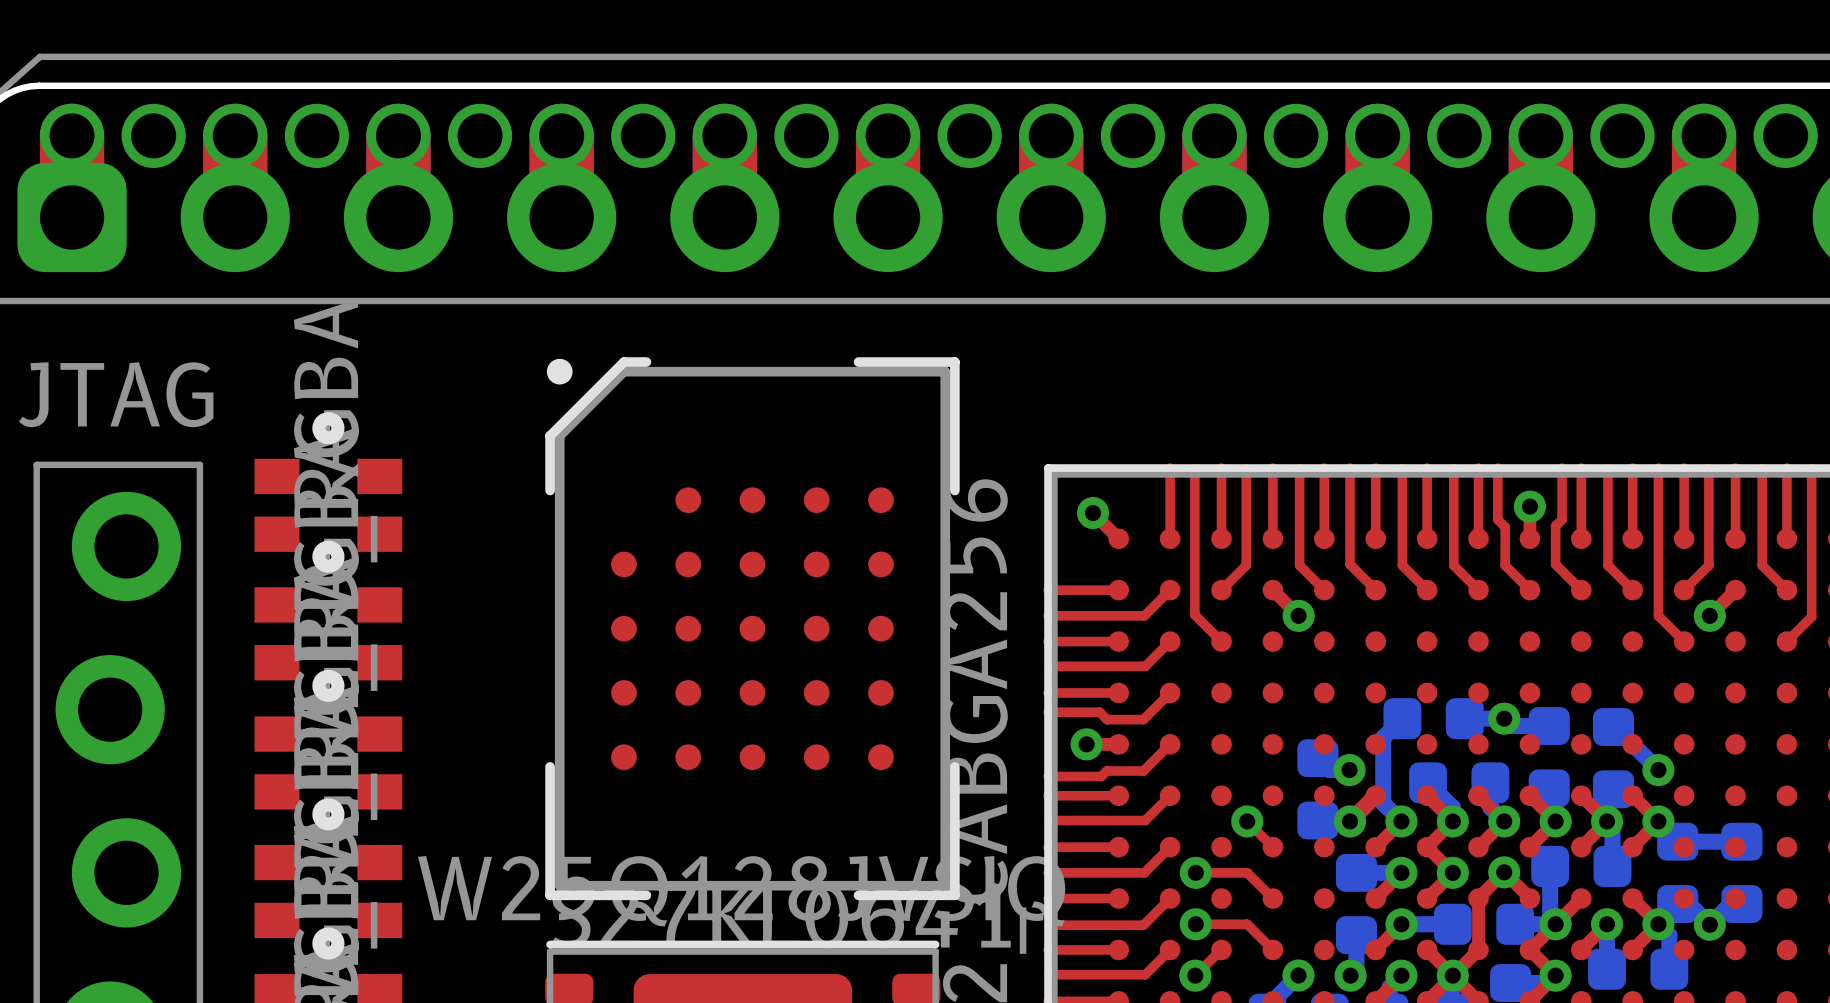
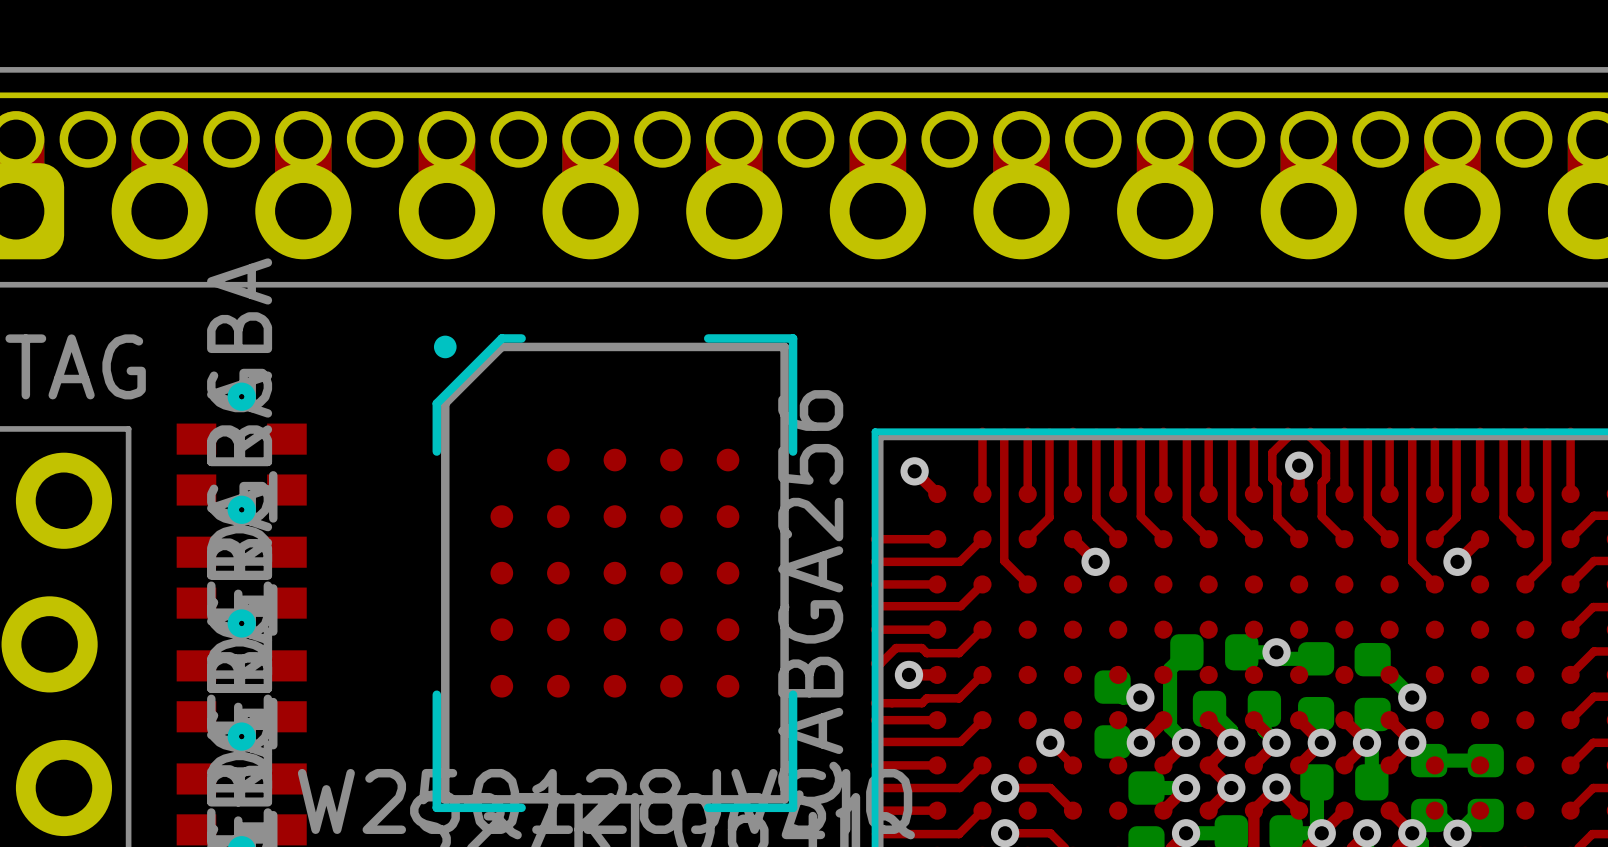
top track: (1497, 468) (1497, 519) (1499, 521) -> (1287, 431) (1287, 437) (1272, 452) (1272, 478)
top track: (1562, 468) (1562, 519) (1560, 521) -> (1310, 431) (1310, 437) (1326, 452) (1326, 478)
top track: (1048, 712) (1099, 712) (1101, 713) -> (875, 663) (880, 663) (896, 648) (921, 648)

